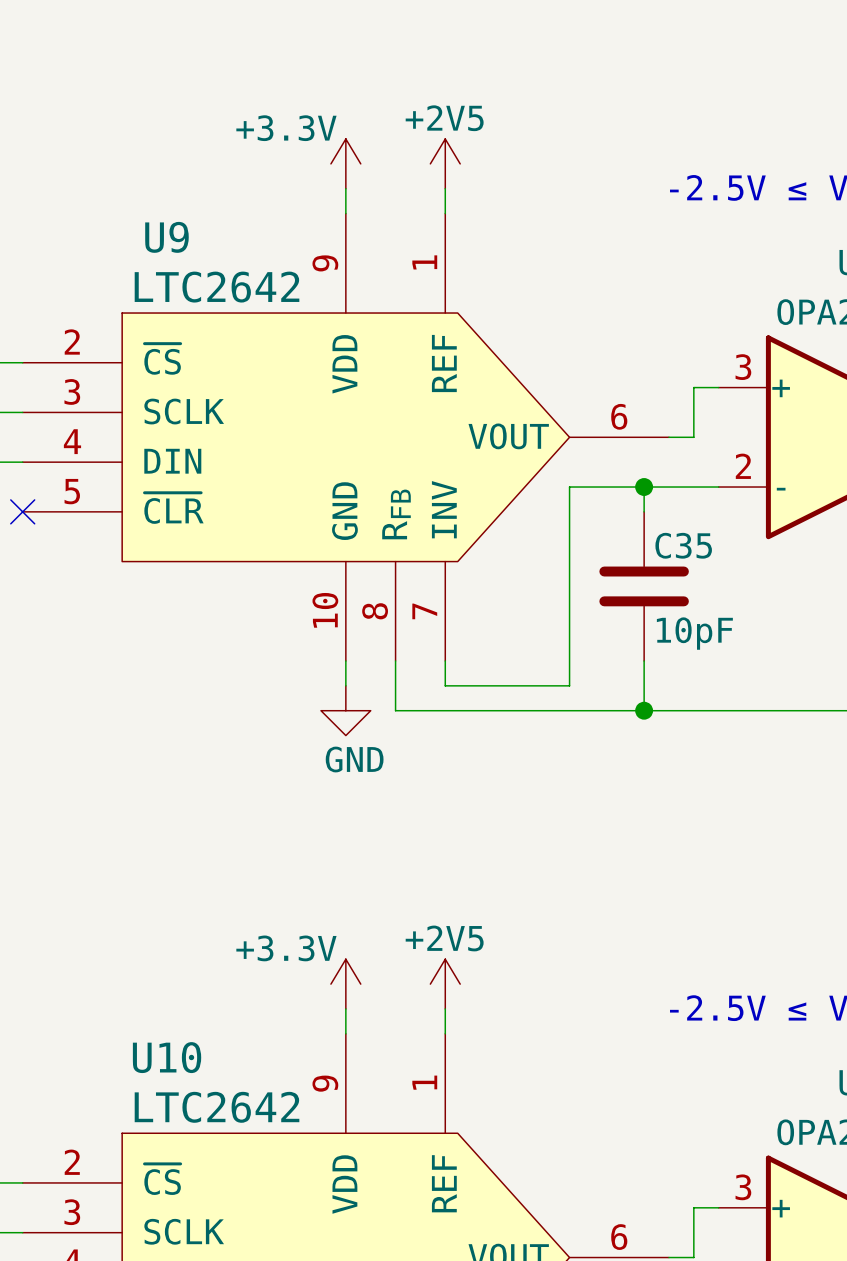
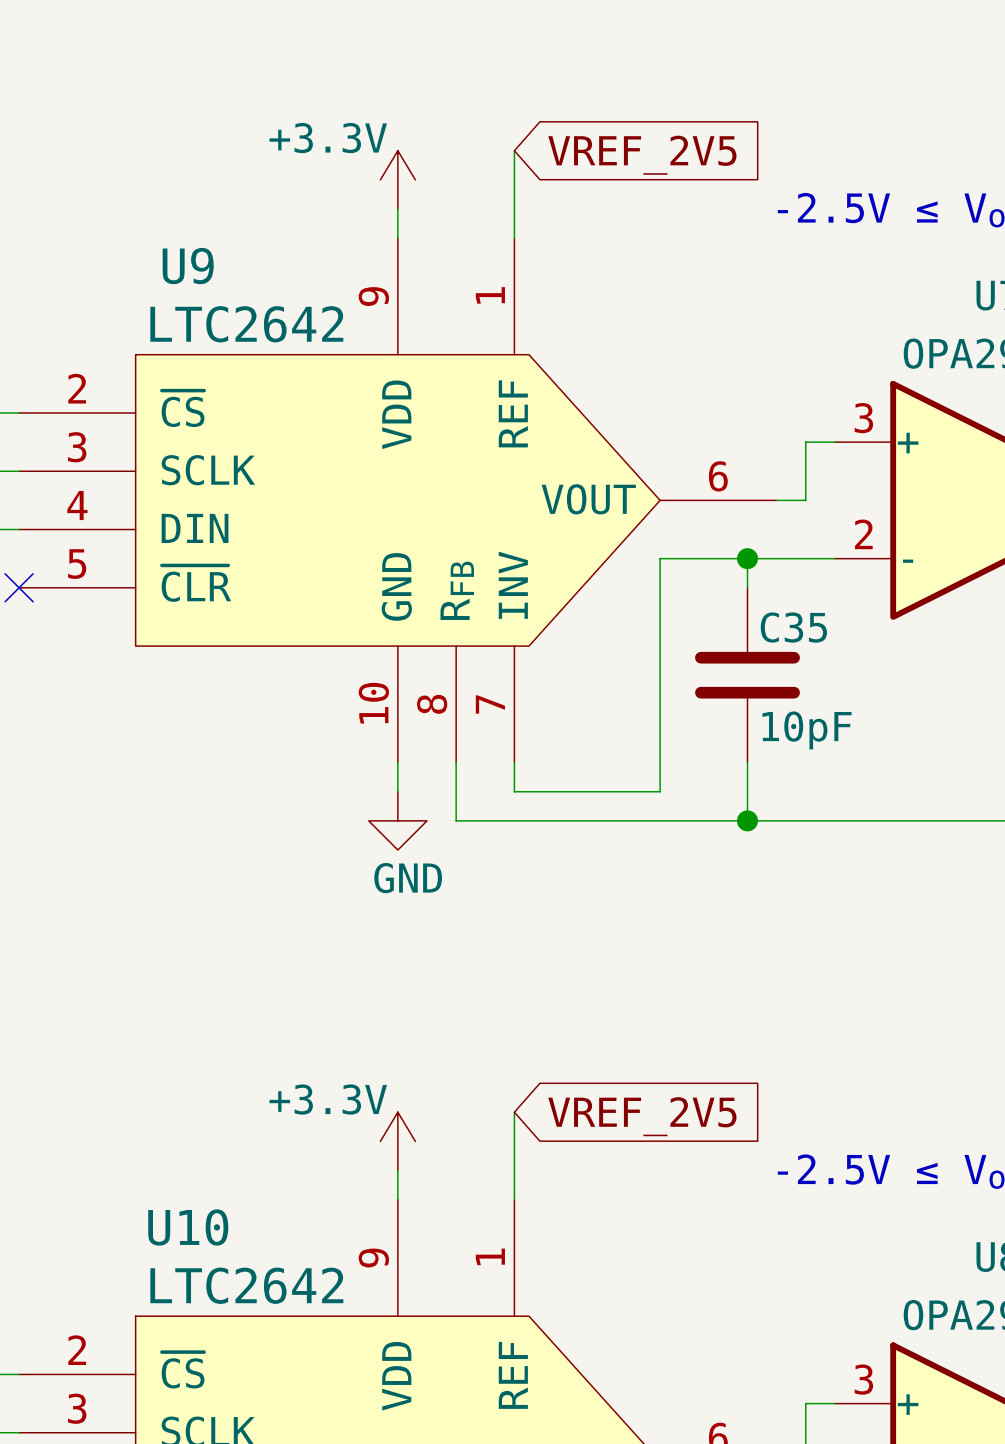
global label: none -> VREF_2V5 (642, 155)
power symbol: +2V5 (445, 163) -> none
global label: none -> VREF_2V5 (642, 1116)
power symbol: +2V5 (445, 984) -> none

